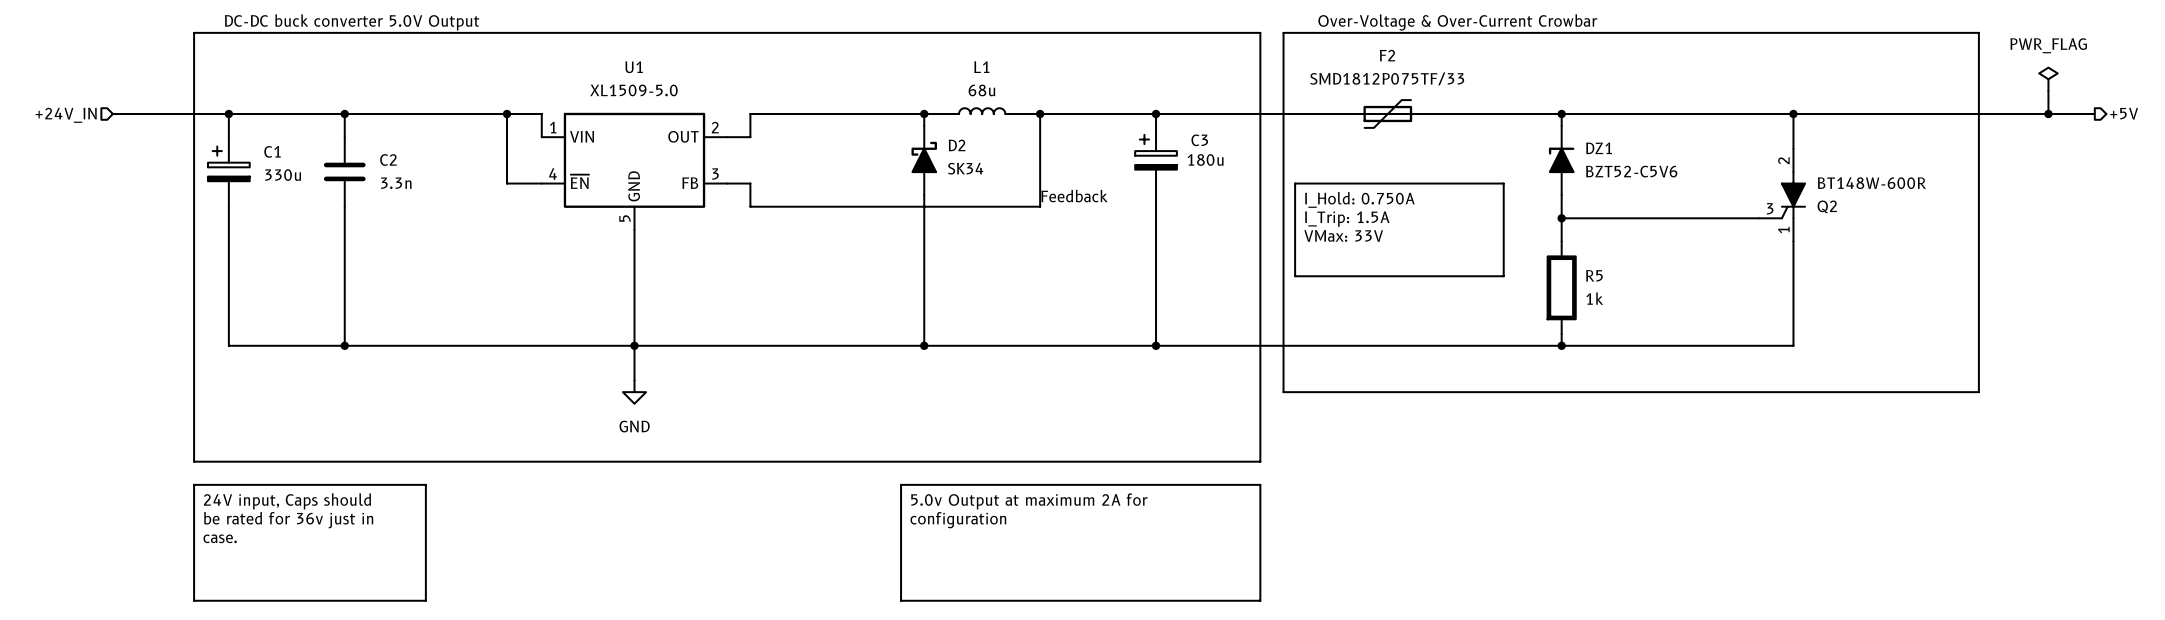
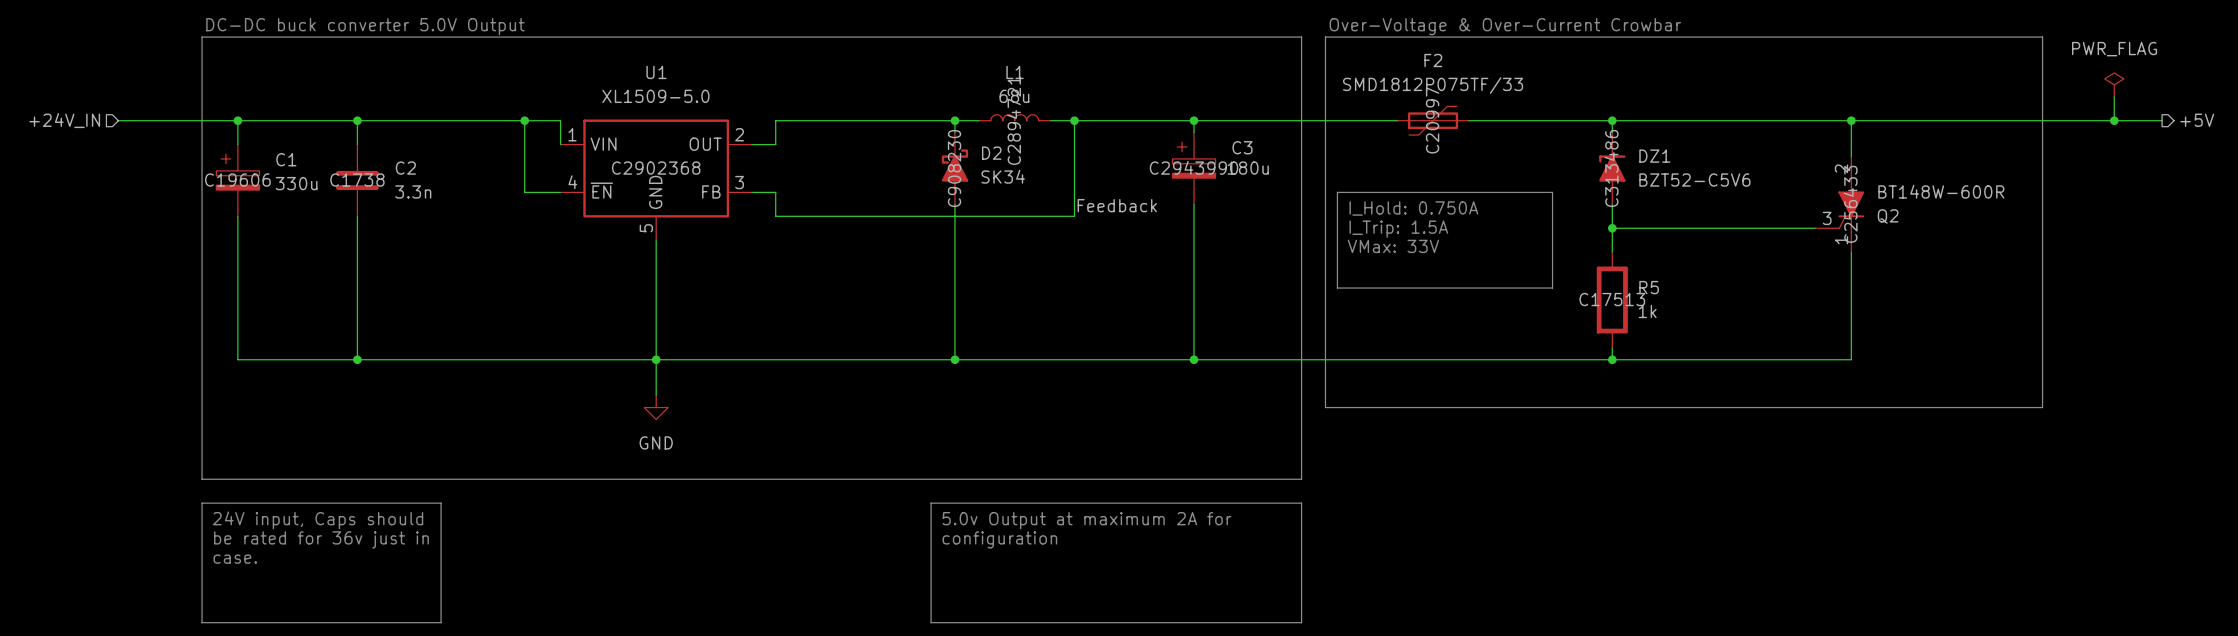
L1 text: none -> C2894721 (1014, 120)
F2 text: none -> C20997 (1432, 120)
C3 text: none -> C2943990 (1194, 167)
U1 text: none -> C2902368 (656, 168)
D2 text: none -> C908230 (954, 168)
DZ1 text: none -> C313486 (1611, 168)
C1 text: none -> C19606 (237, 180)
C2 text: none -> C1738 (357, 180)
Q2 text: none -> C256433 (1850, 204)
R5 text: none -> C17513 (1612, 299)

